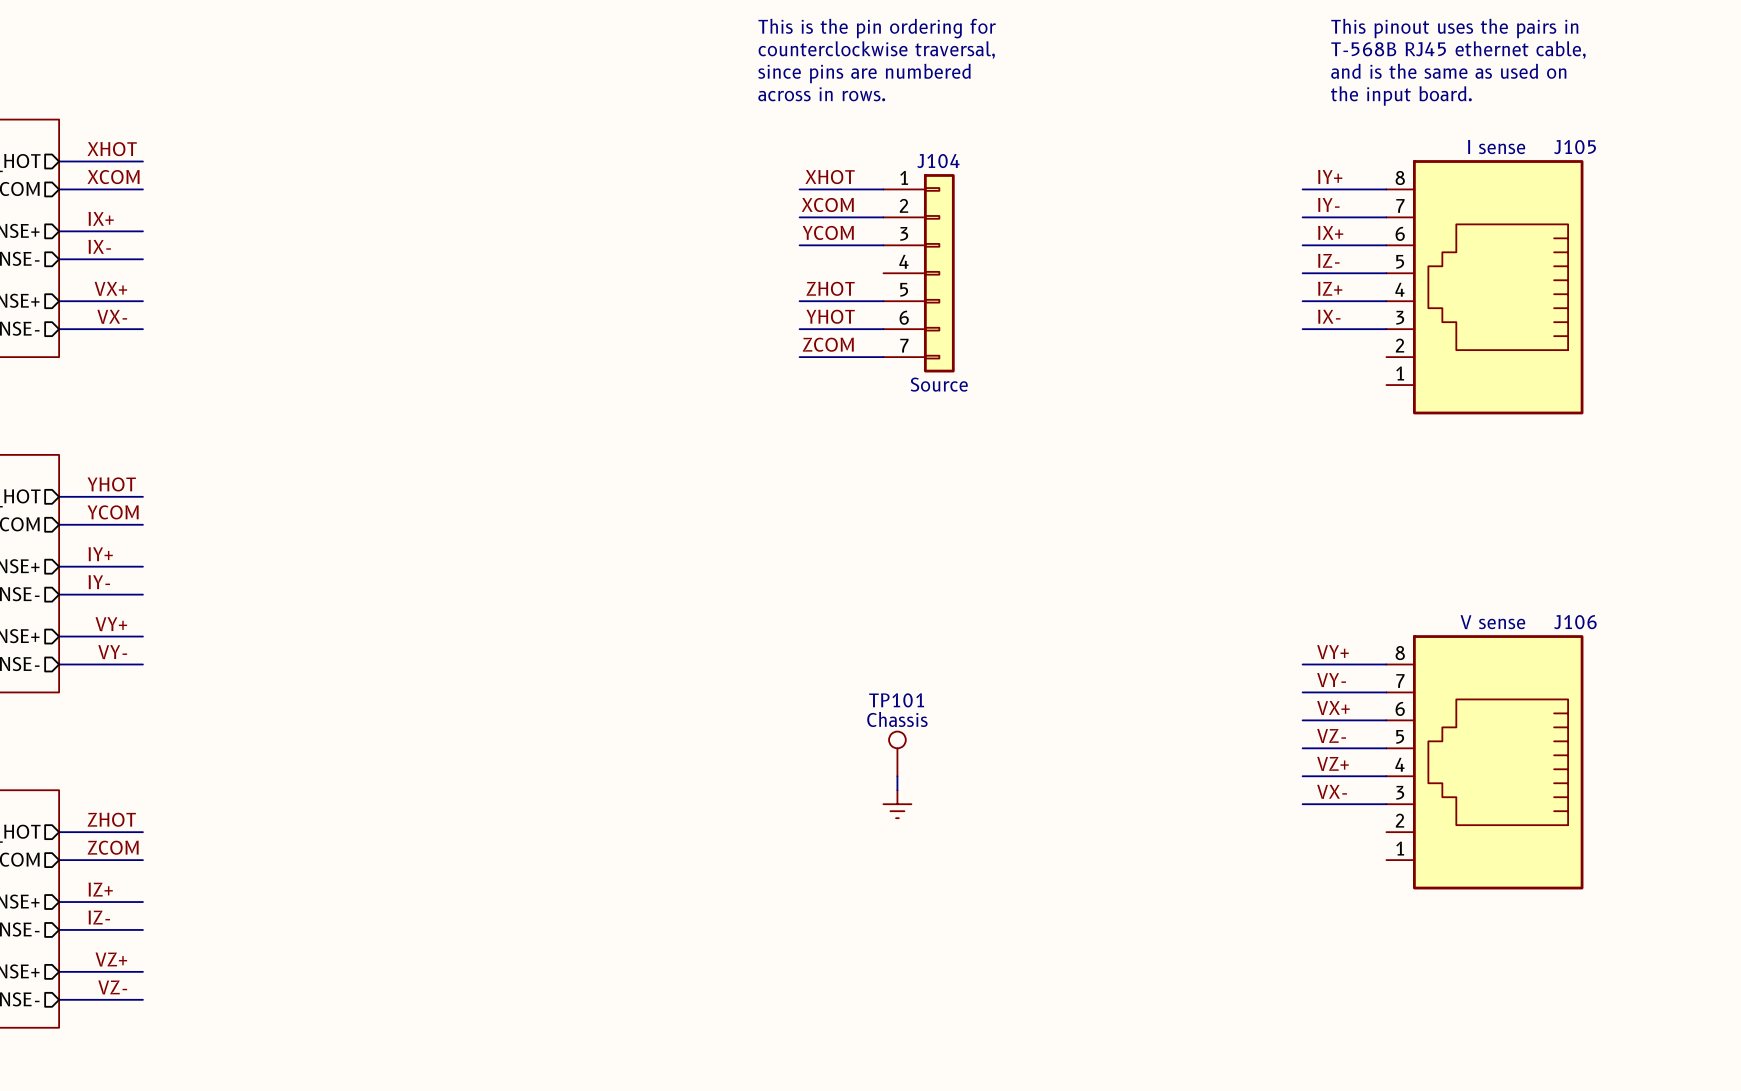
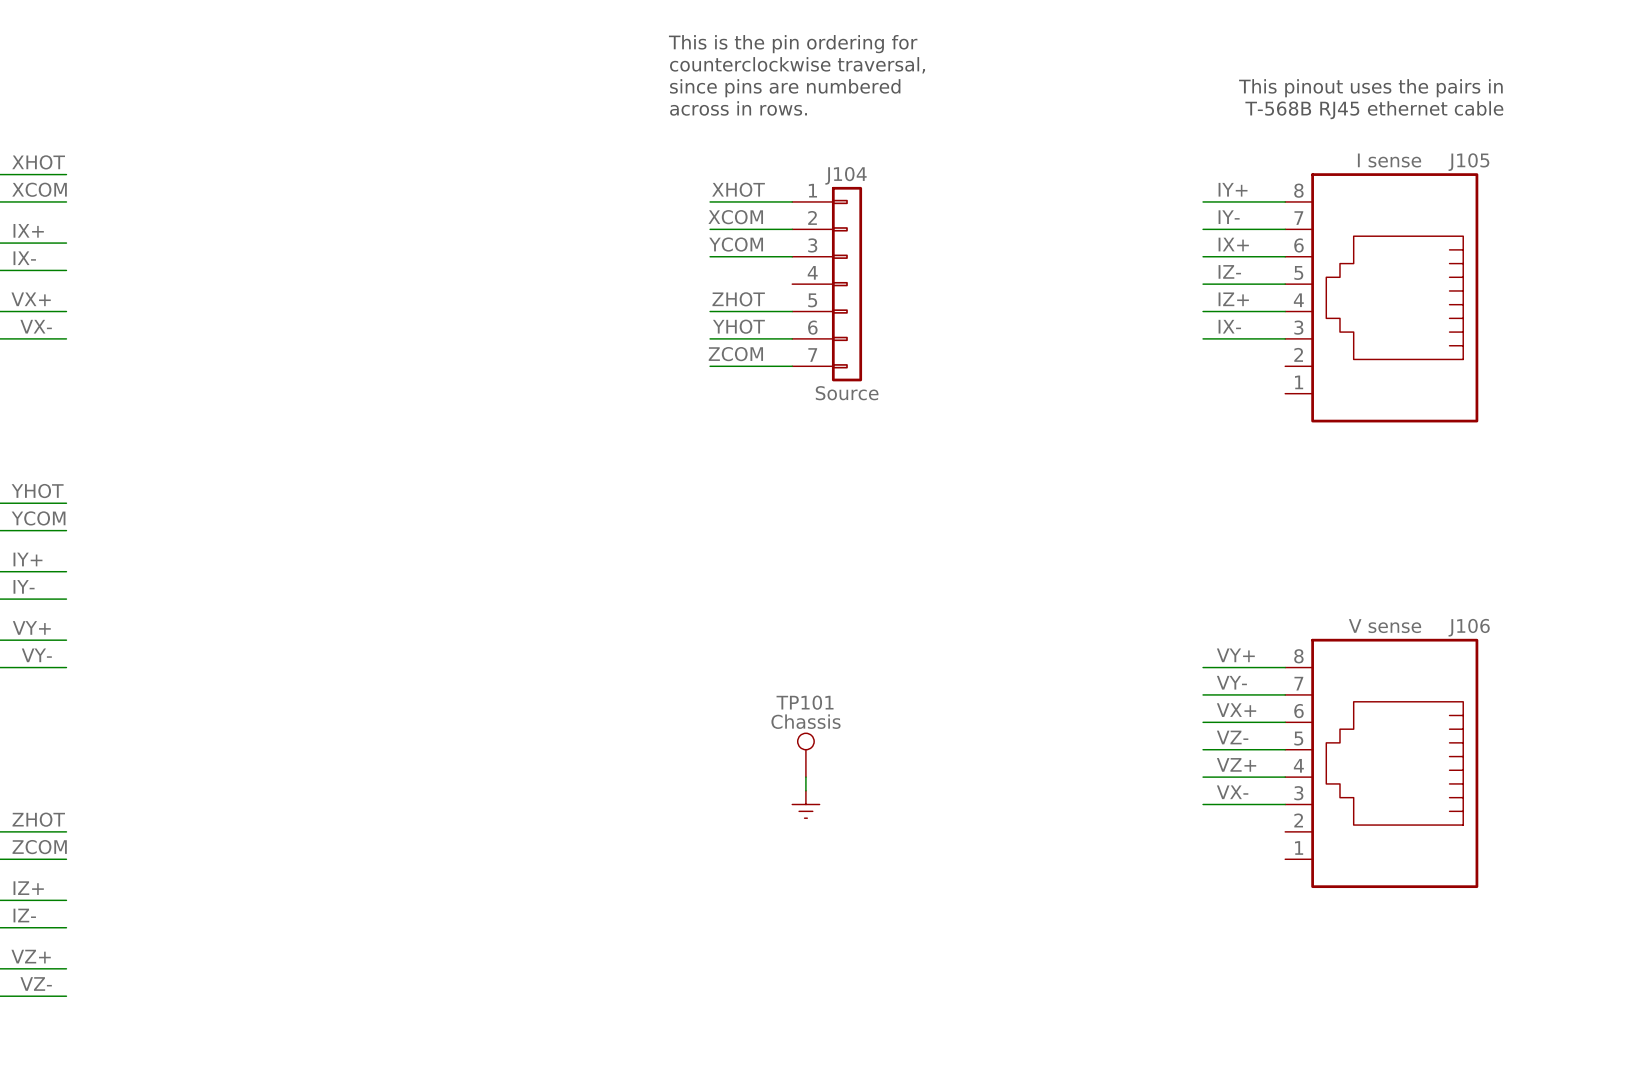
text: This pinout uses the pairs in (1454, 28) -> none
text: T-568B RJ45 ethernet cable, (1458, 50) -> none
text: and is the same as used on (1448, 71) -> none
text: none -> This pinout uses the pairs in (1370, 88)
text: none -> T-568B RJ45 ethernet cable (1374, 110)
text: the input board. (1401, 95) -> none

